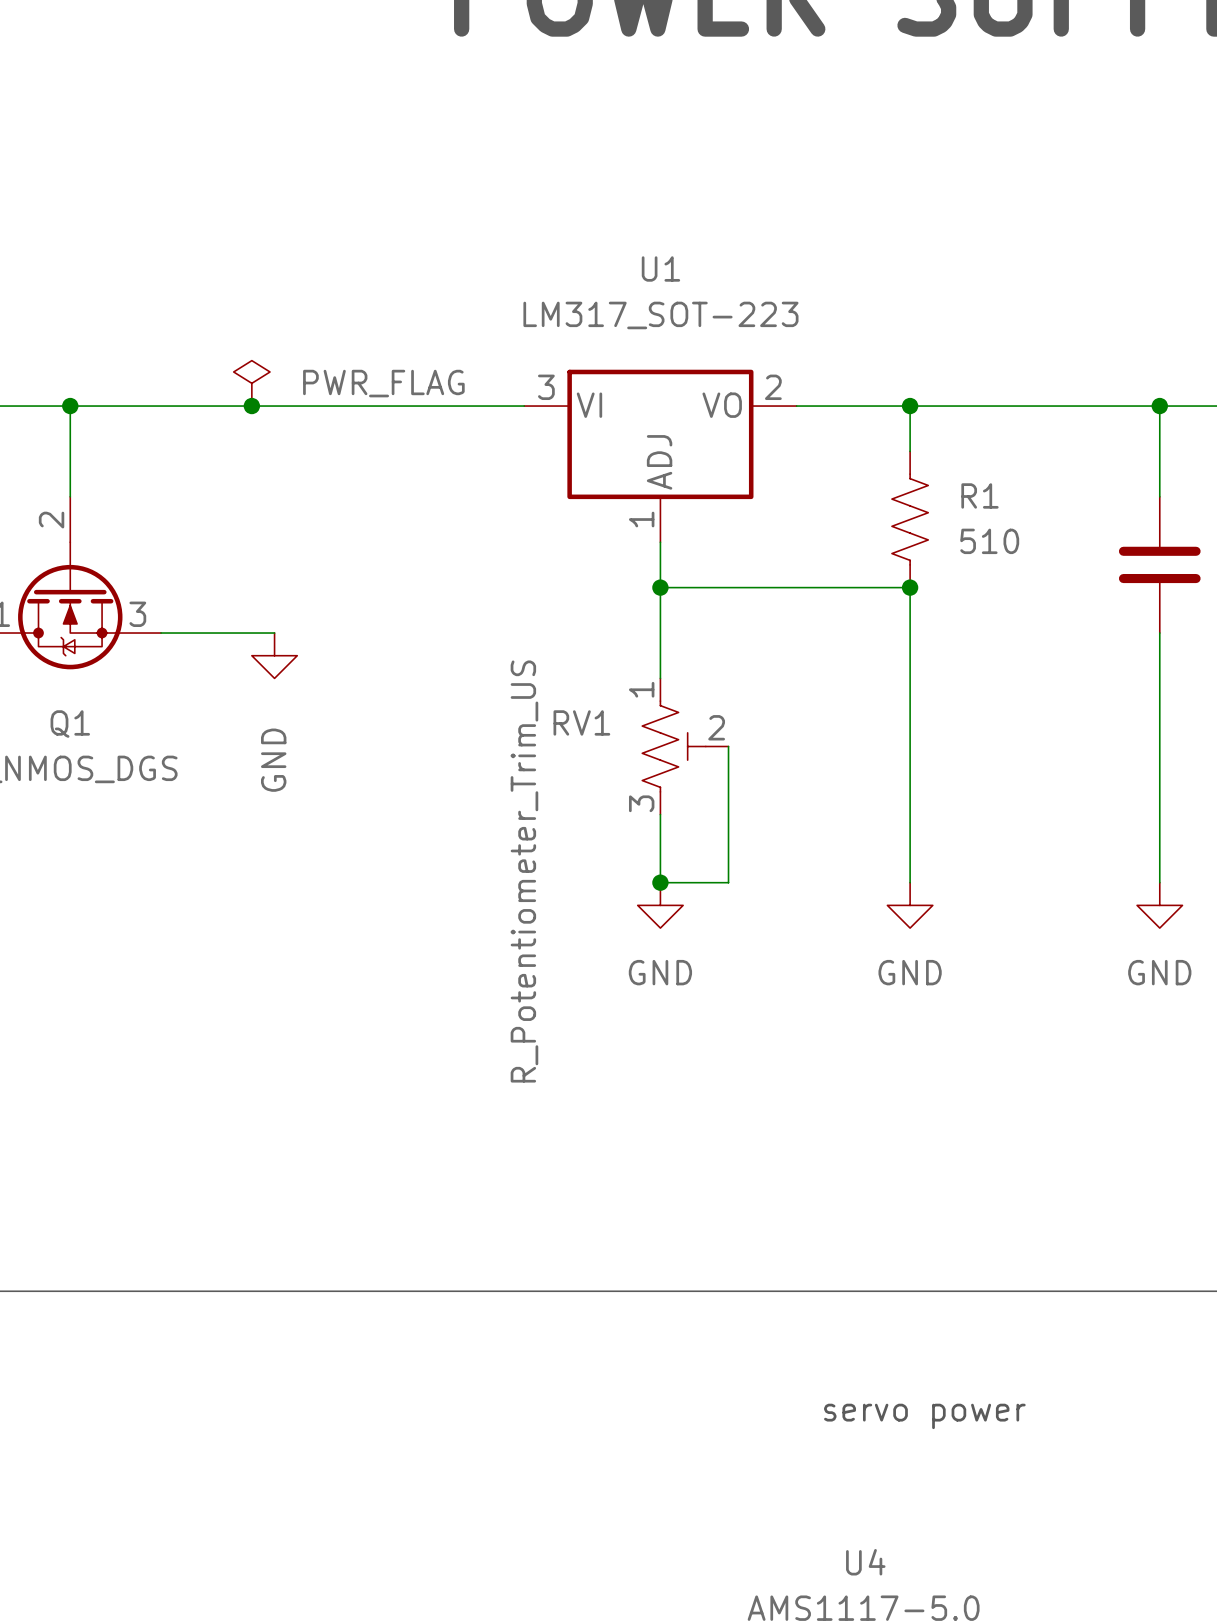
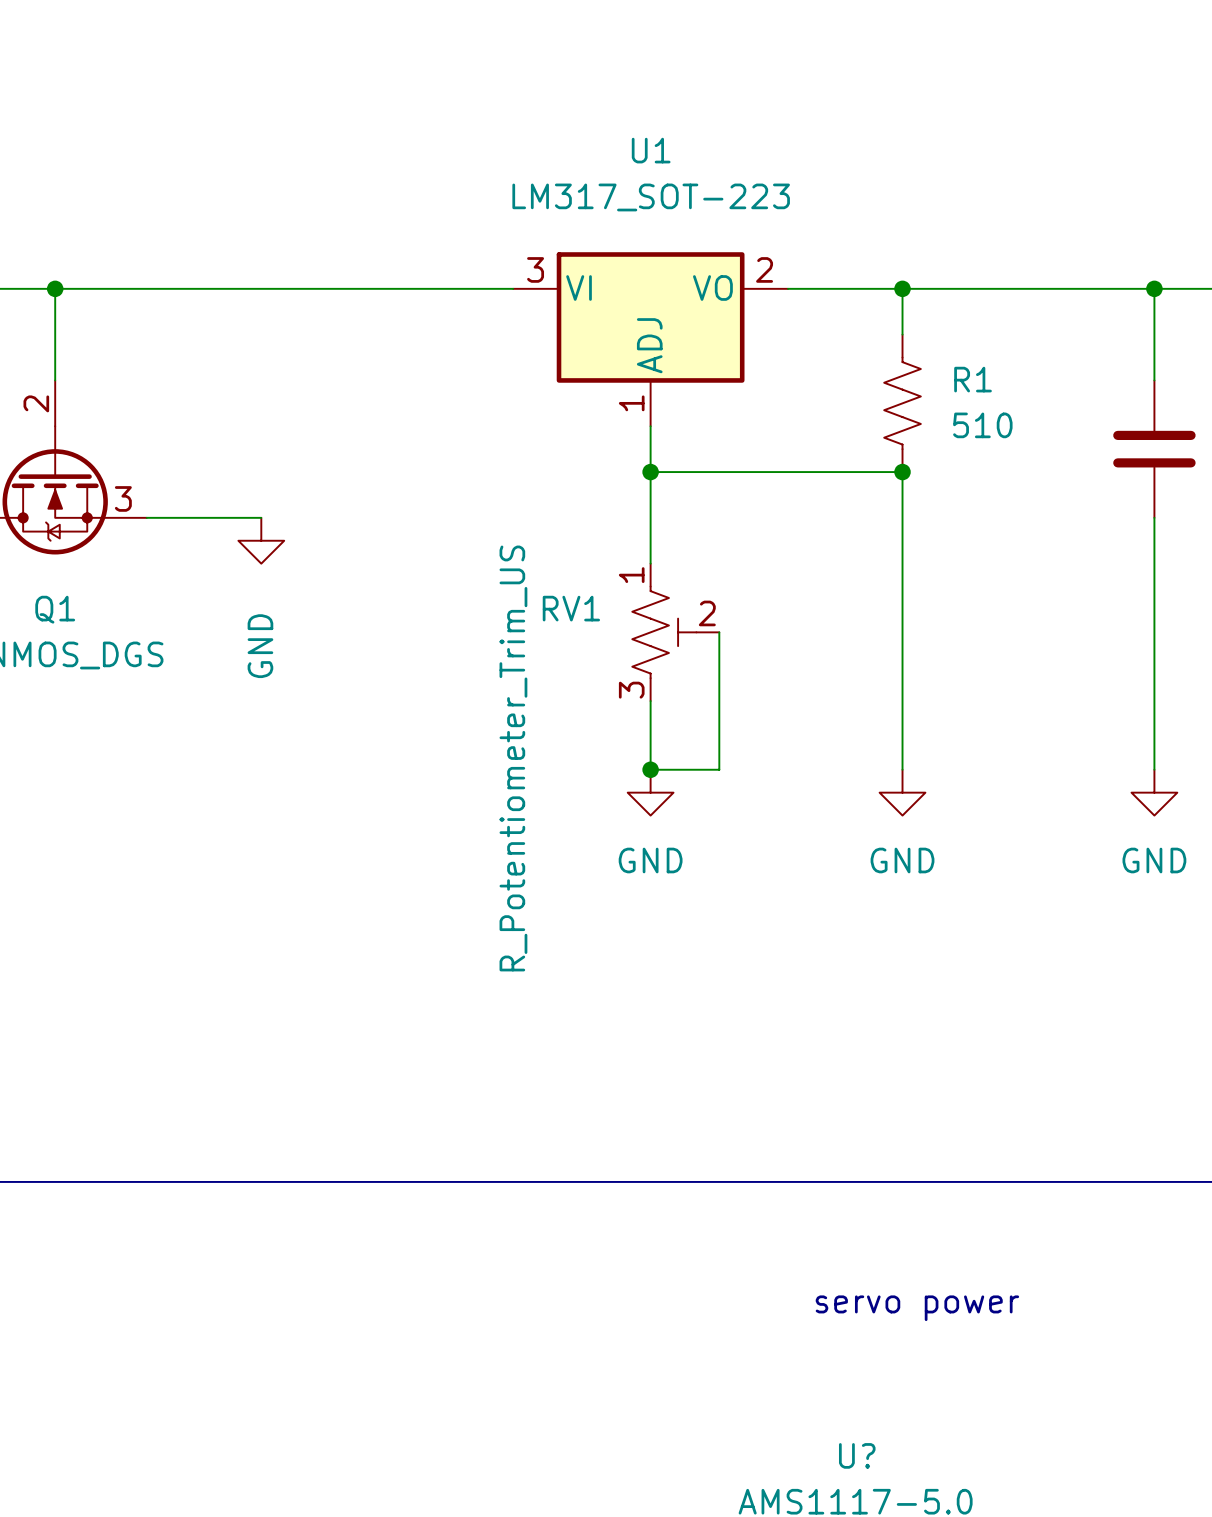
power symbol: PWR_FLAG (251, 383) -> none
junction: (251, 406) -> none
U4 name: U4 (865, 1562) -> U? (857, 1455)

